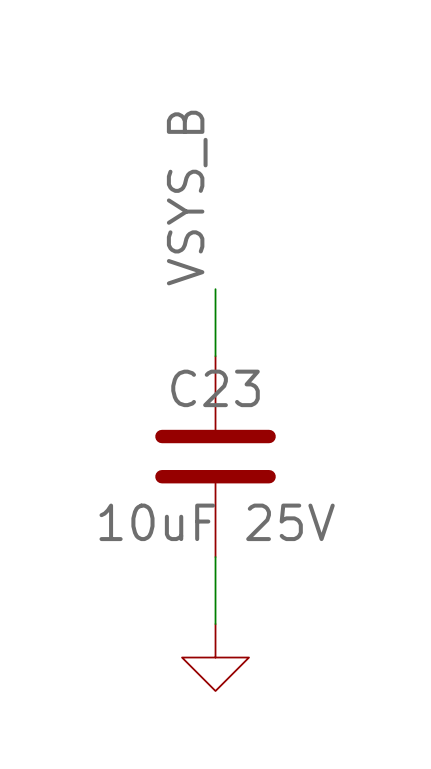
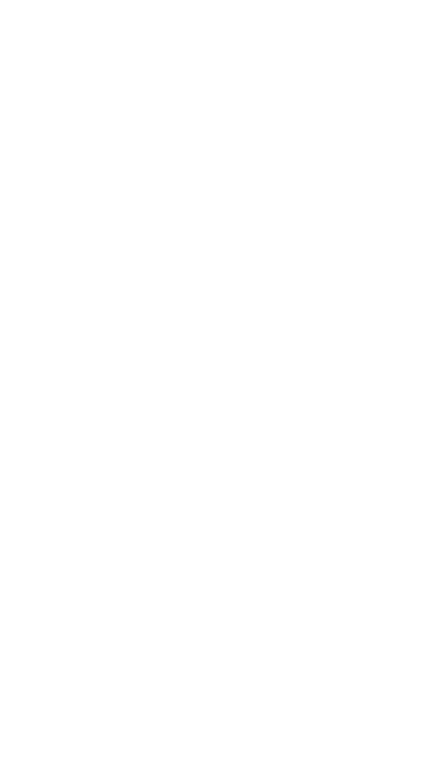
label: VSYS_B (187, 198) -> none
wire: (215, 289) (215, 356) -> none
C23: 10uF 25V (215, 456) -> none
wire: (215, 557) (215, 624) -> none
power symbol: (215, 657) -> none

